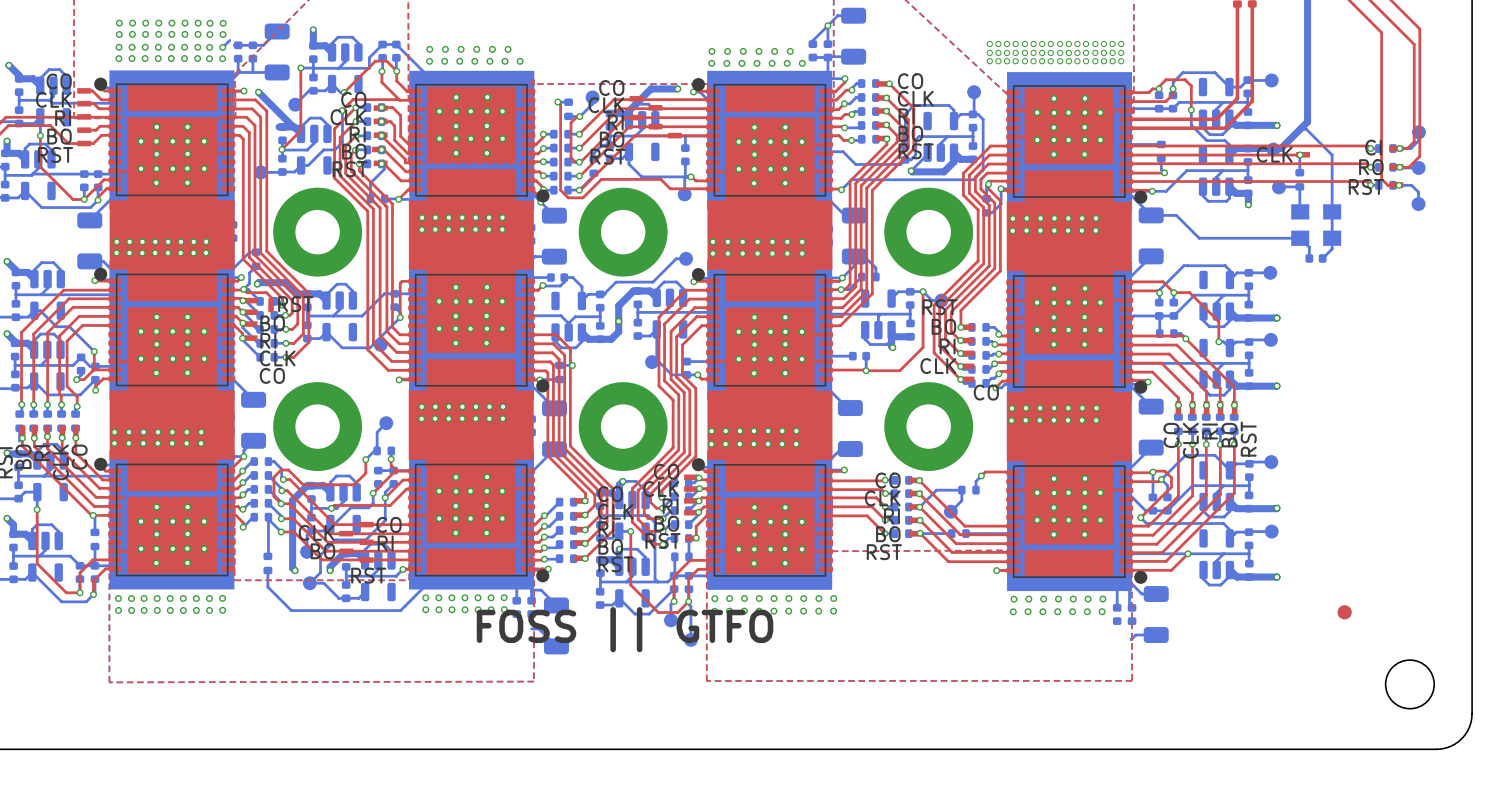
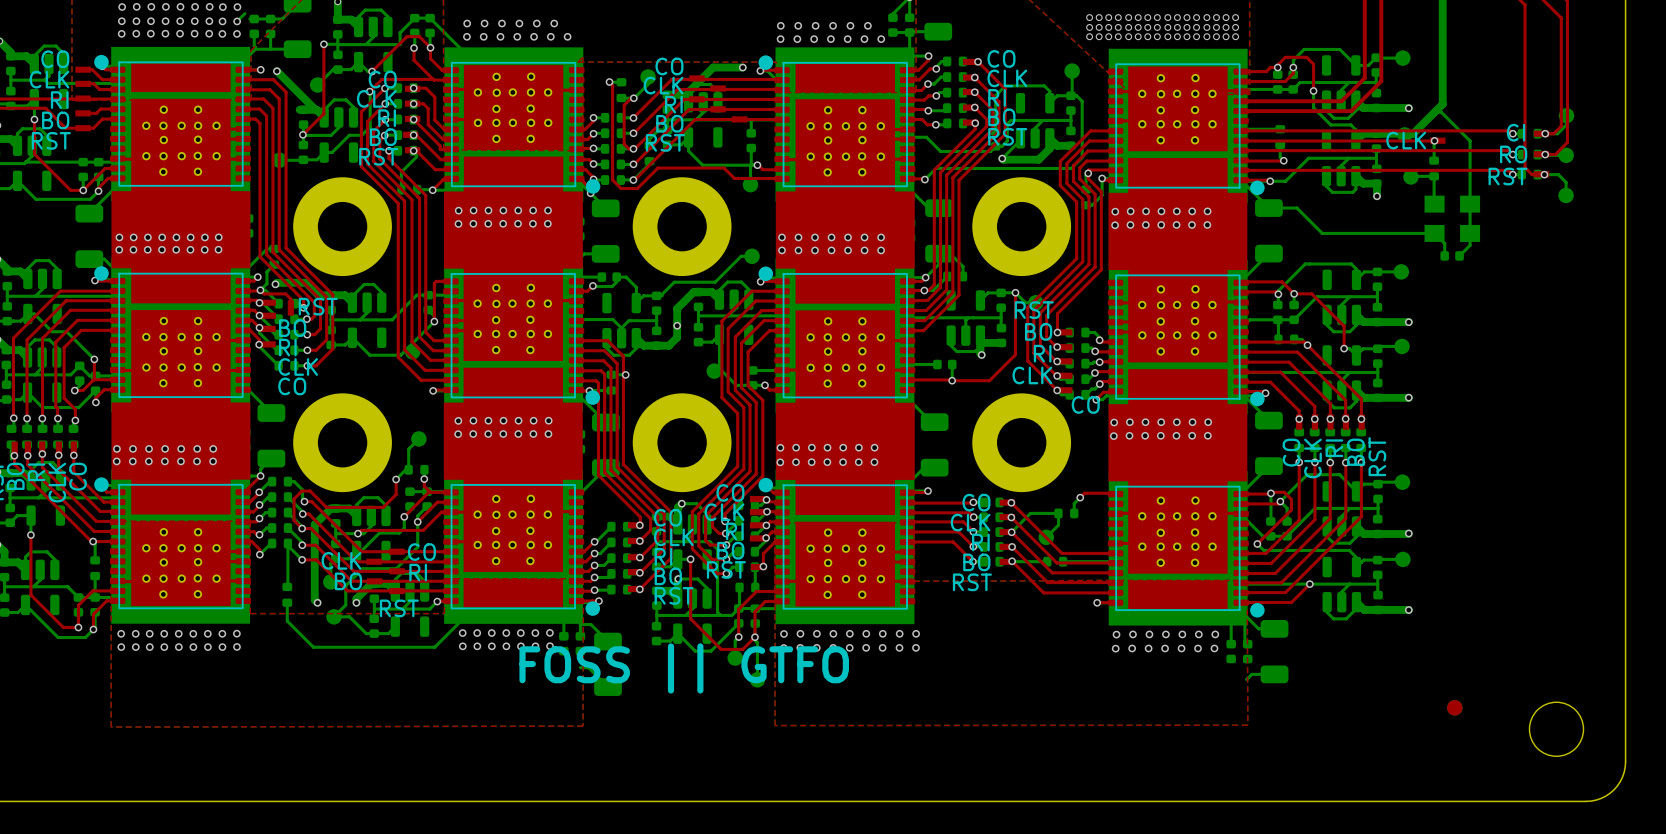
part position: (1344, 612) -> (1454, 707)

